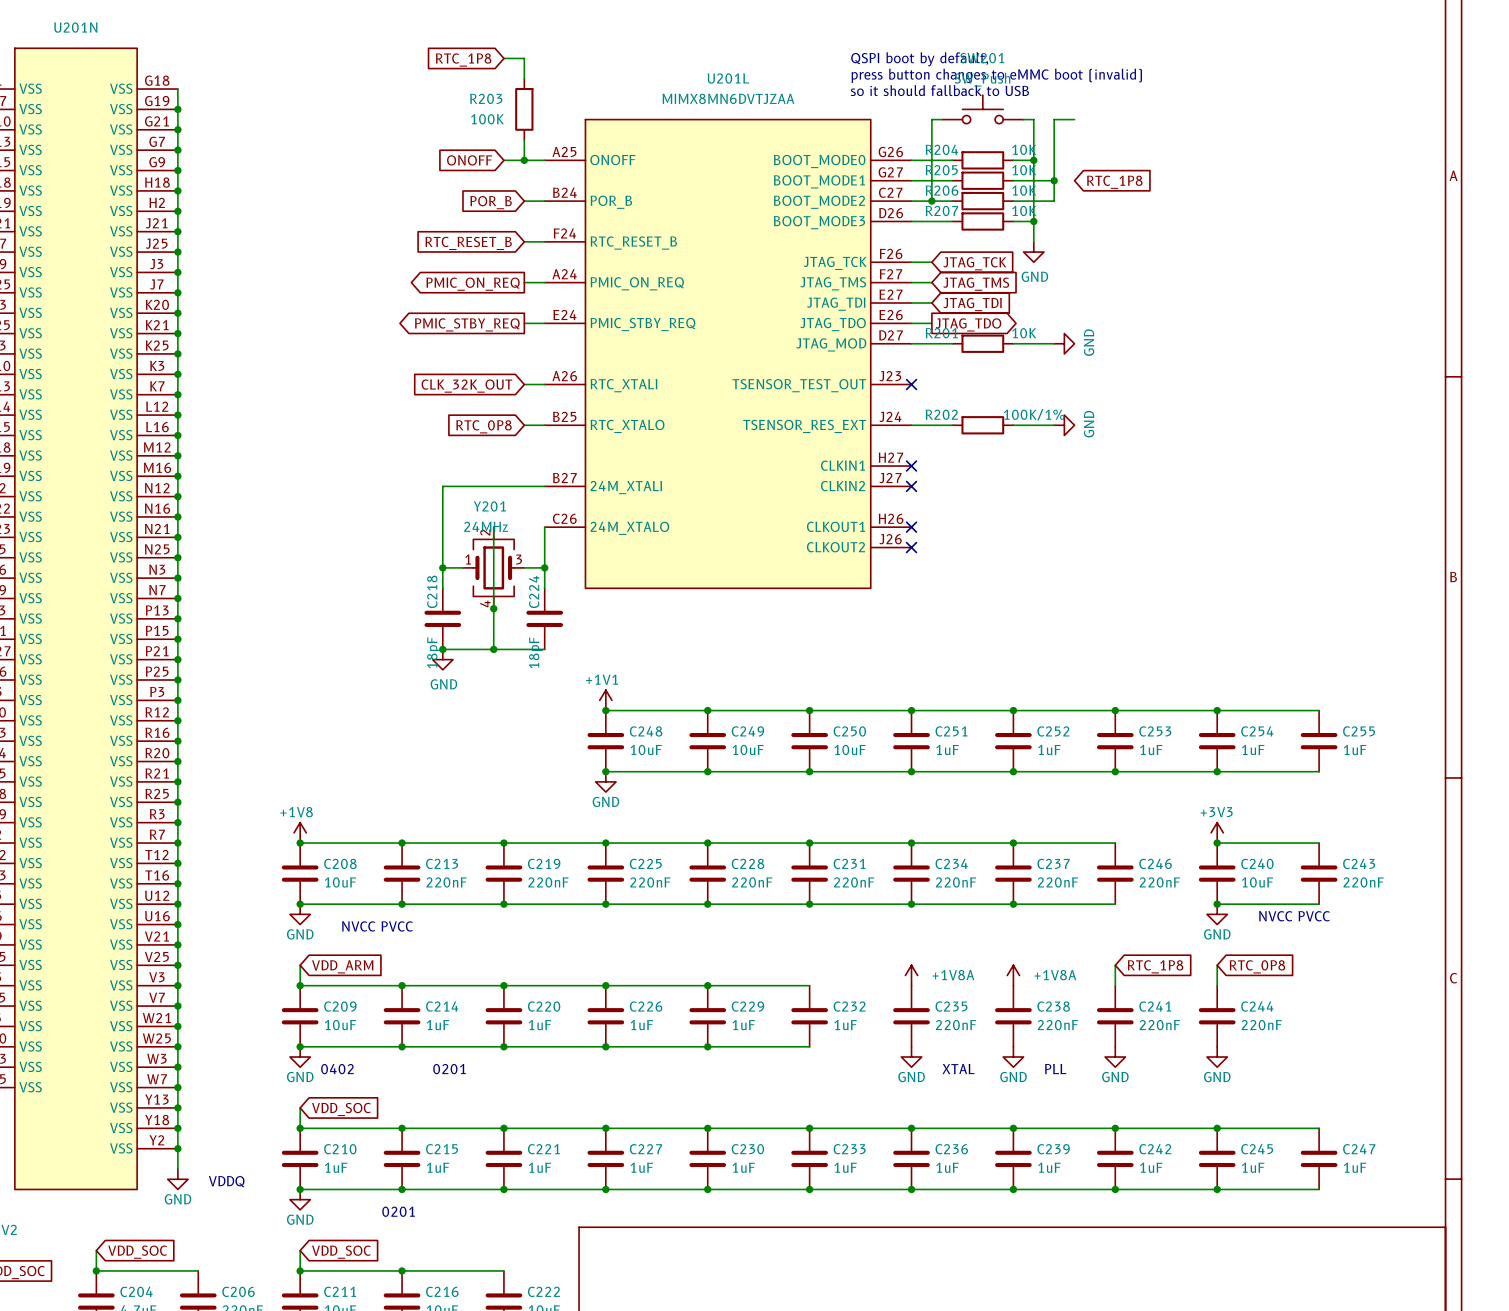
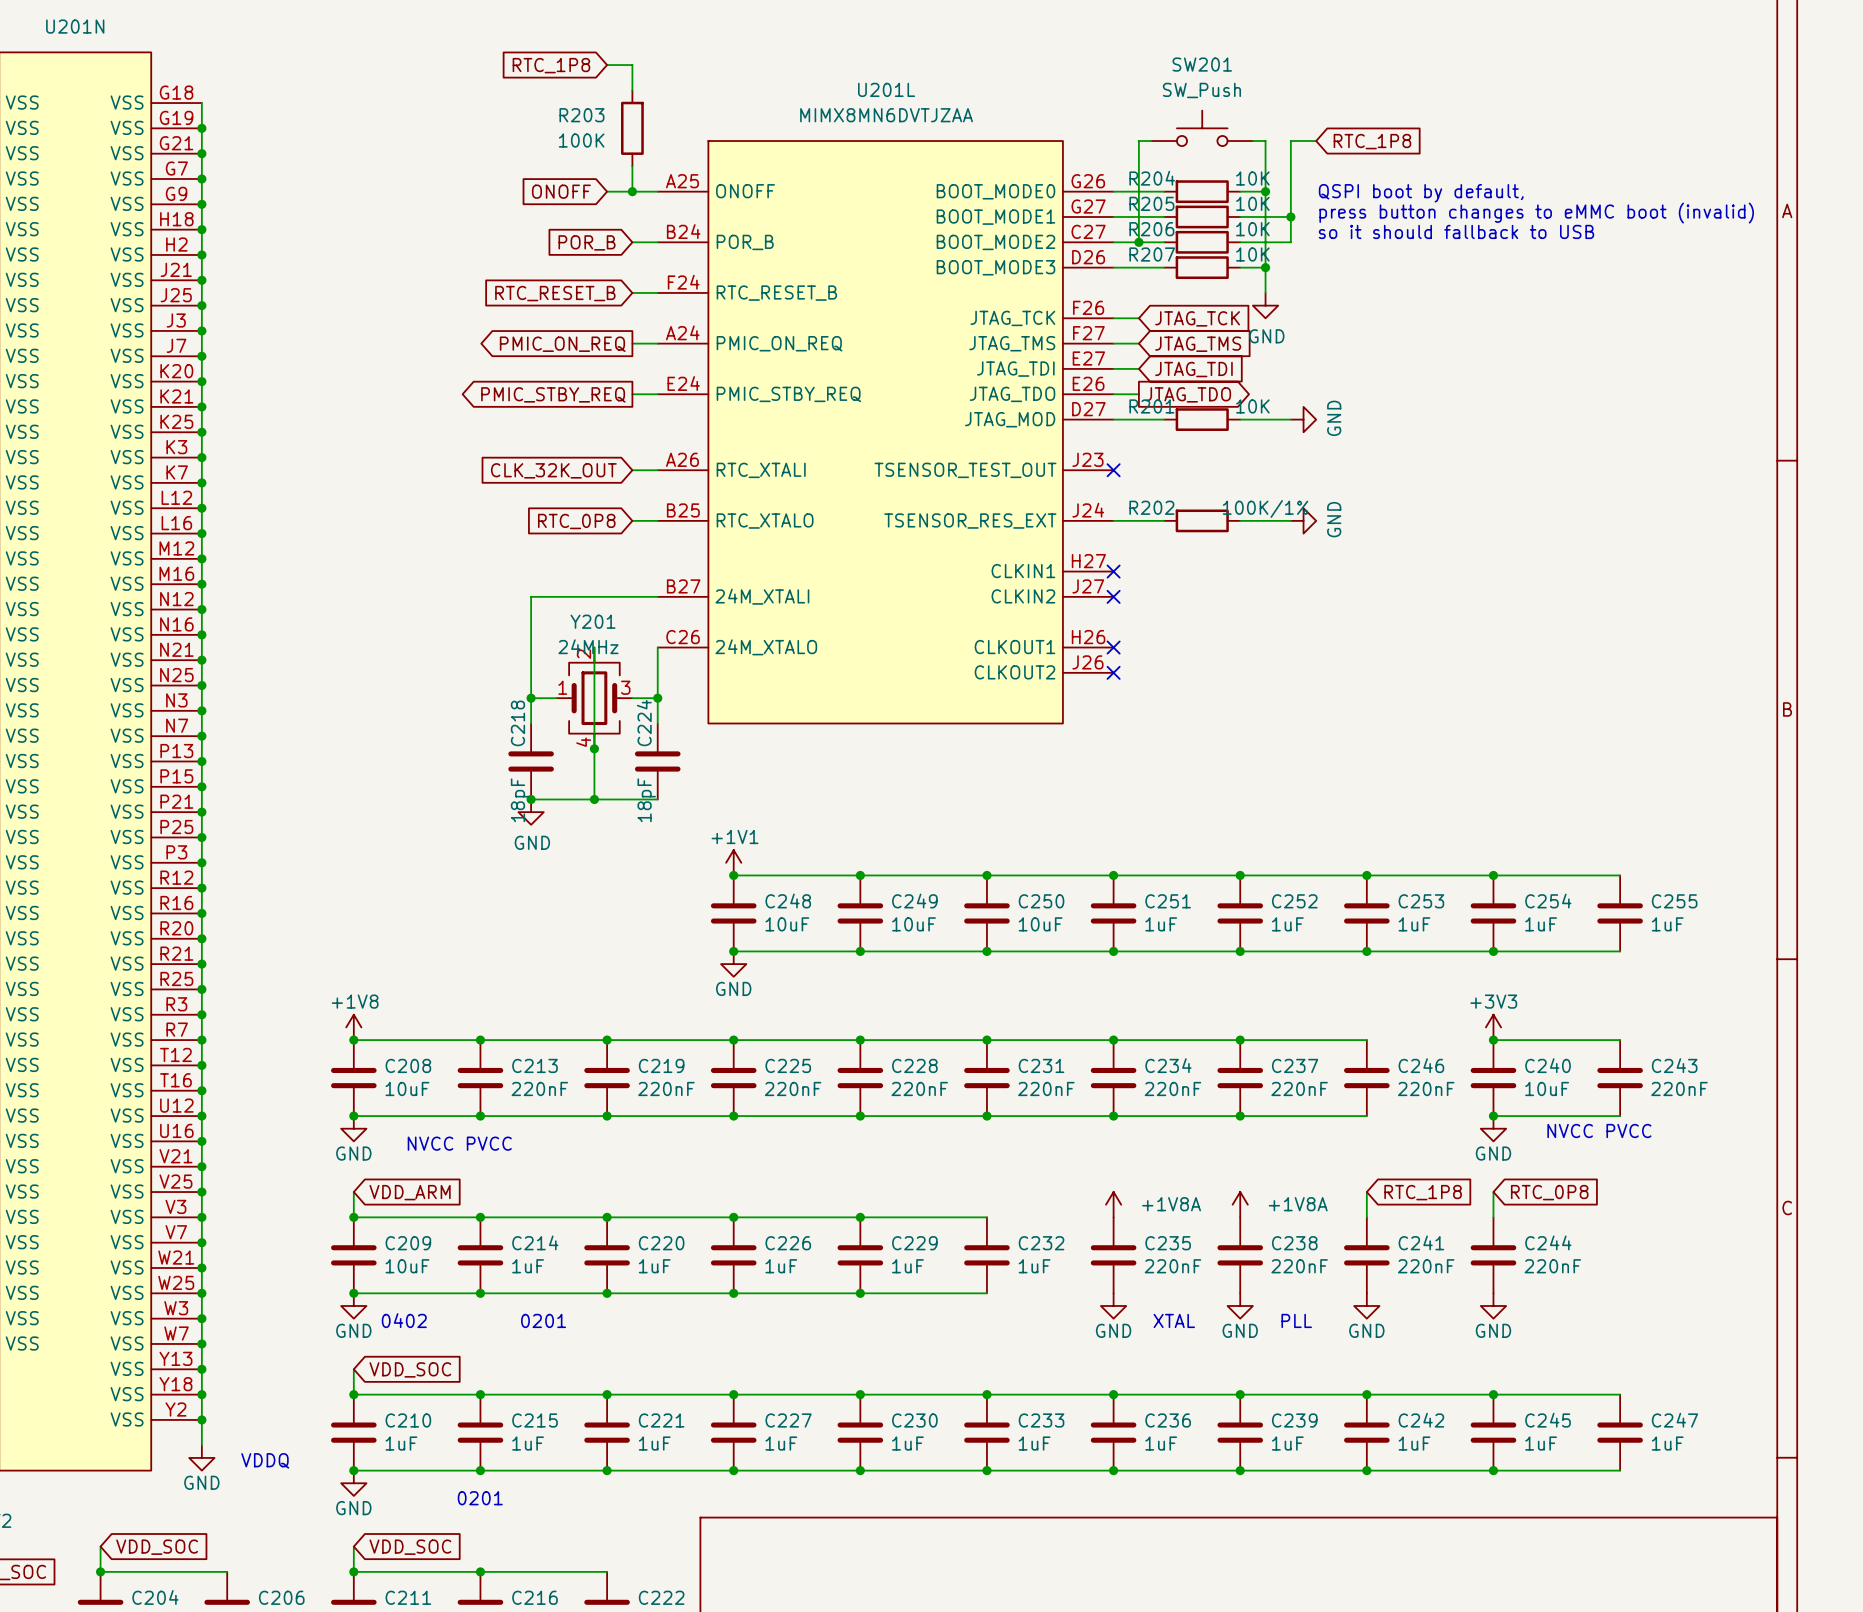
text: QSPI boot by default, (919, 59) -> none
text: press button changes to eMMC boot (invalid) (996, 75) -> none
text: so it should fallback to USB (939, 90) -> none
text: none -> QSPI boot by default, (1421, 193)
text: none -> press button changes to eMMC boot (invalid) (1536, 213)
global label position: RTC_1P8 (1114, 182) -> RTC_1P8 (1372, 141)
text: none -> so it should fallback to USB (1456, 231)

